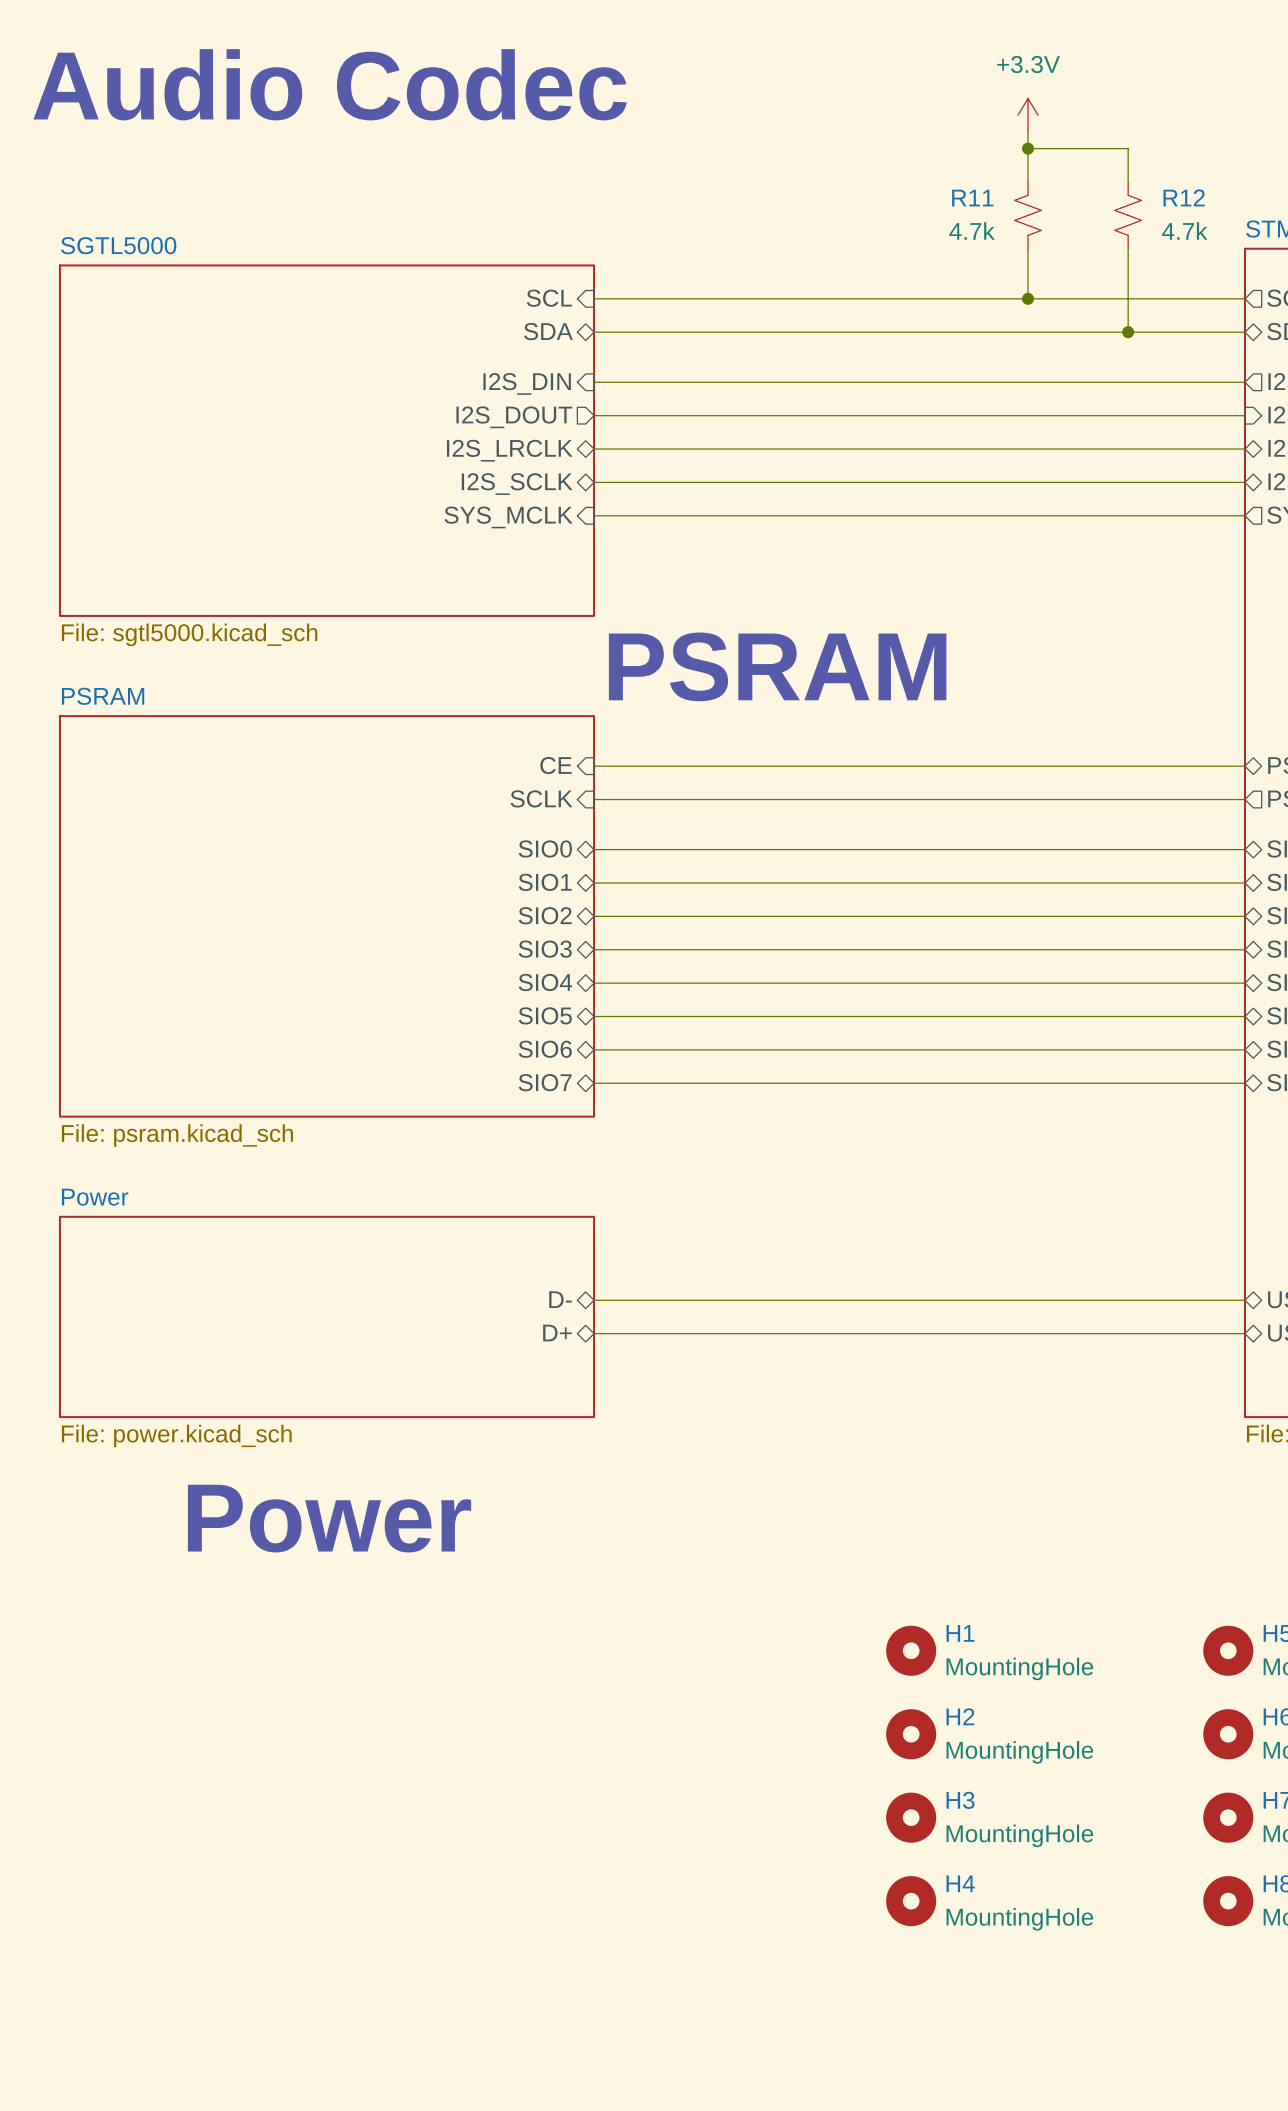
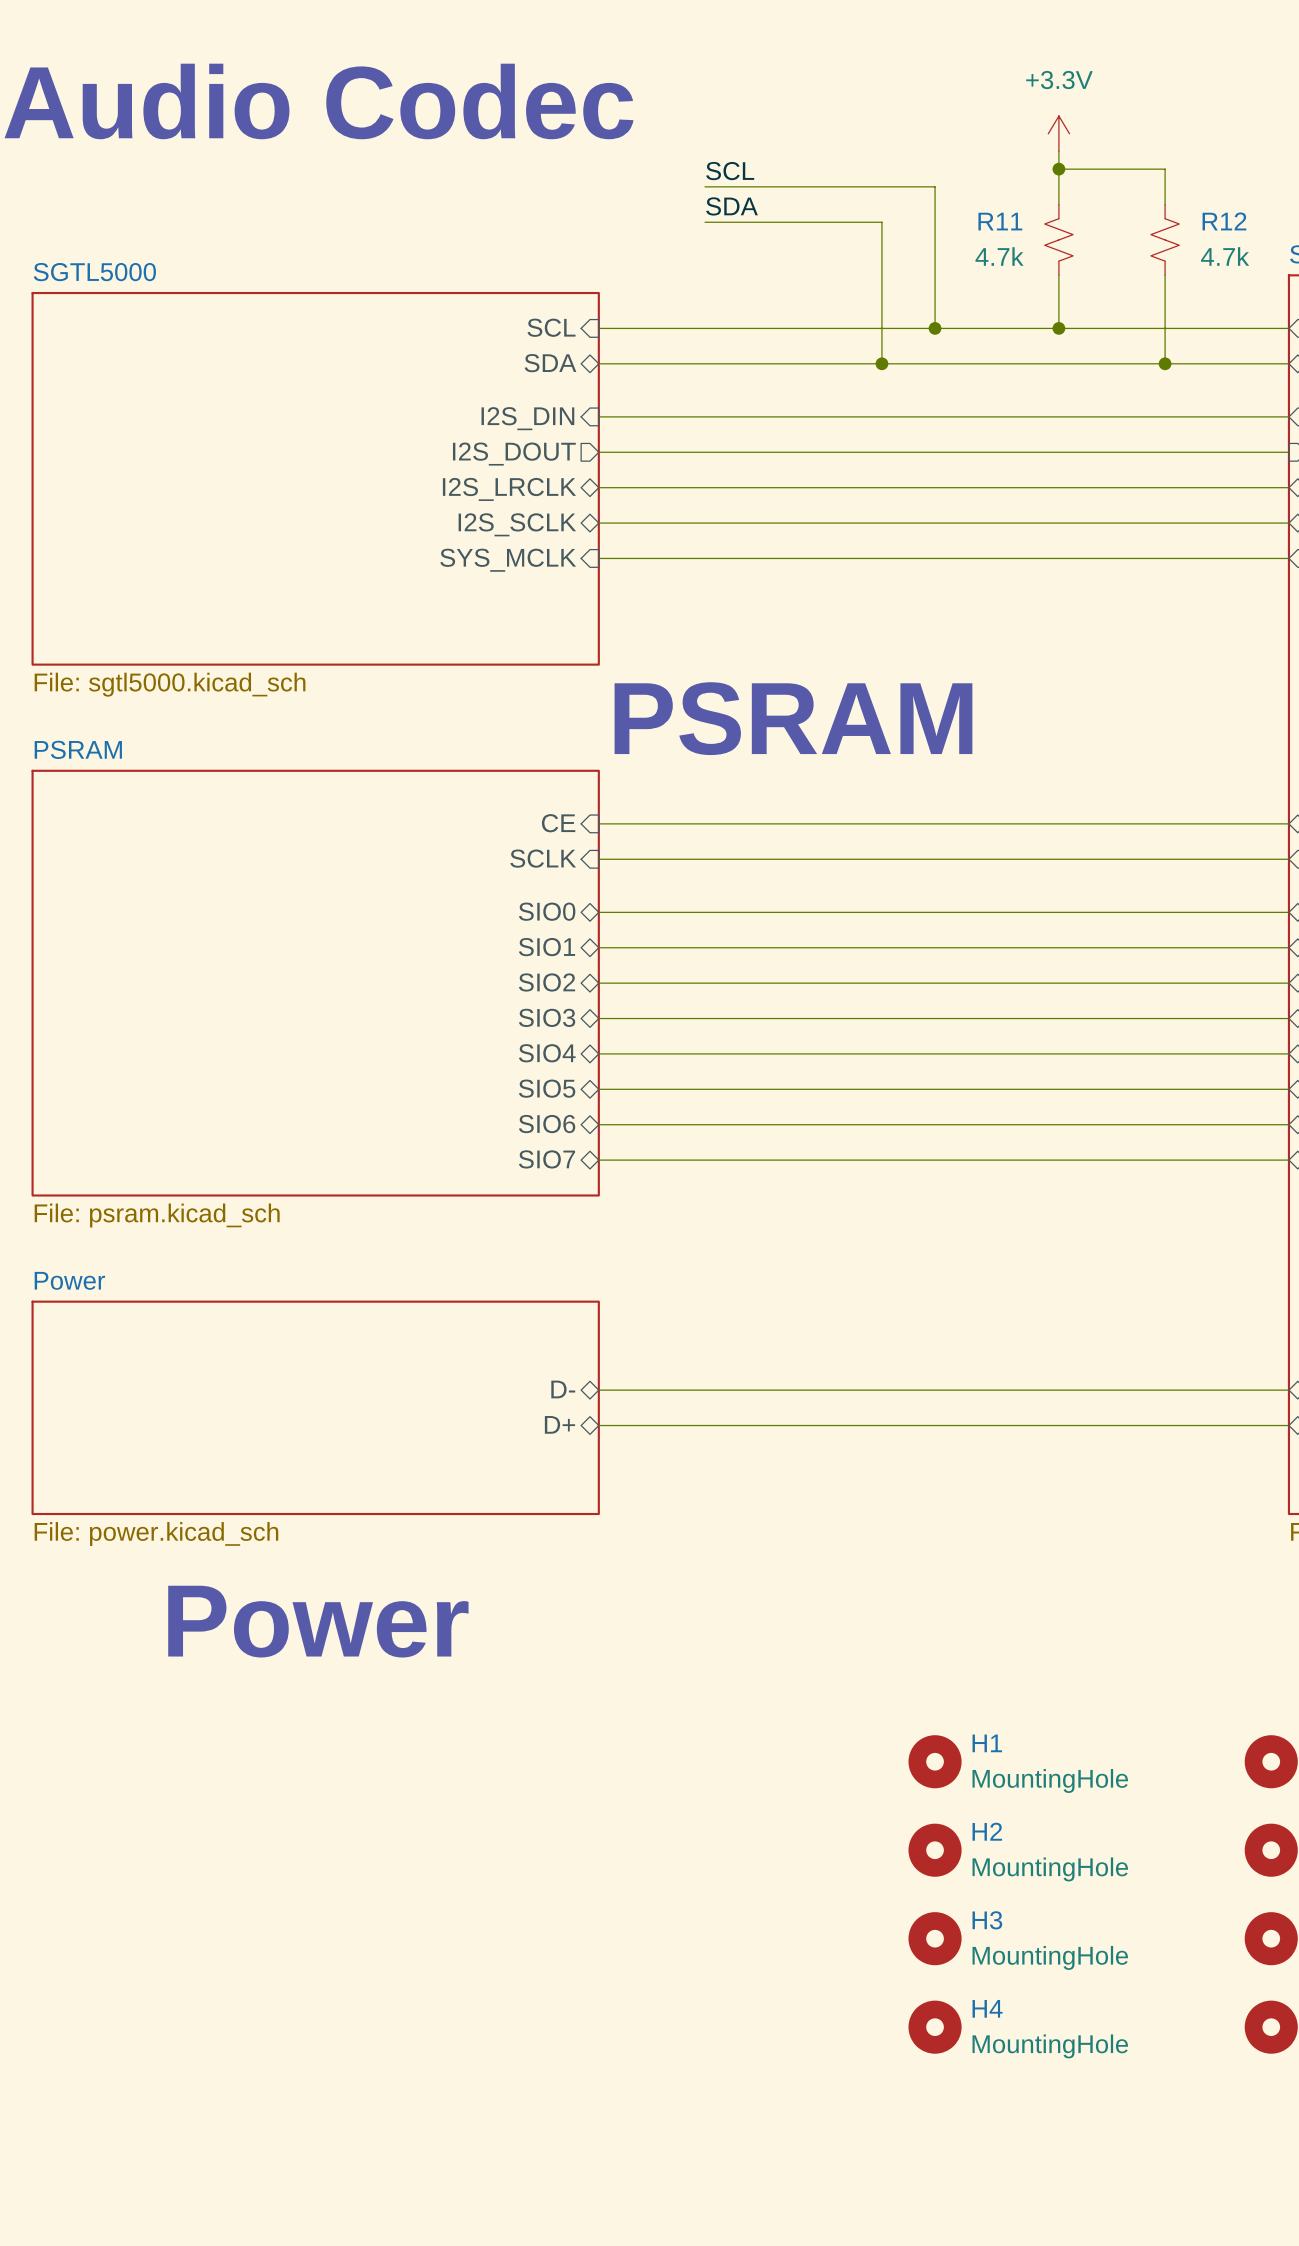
label: none -> SCL (730, 171)
wire: none -> (705, 186) (935, 186) (935, 328)
label: none -> SDA (732, 206)
wire: none -> (705, 222) (881, 222) (881, 363)
junction: none -> (935, 328)
junction: none -> (881, 363)

